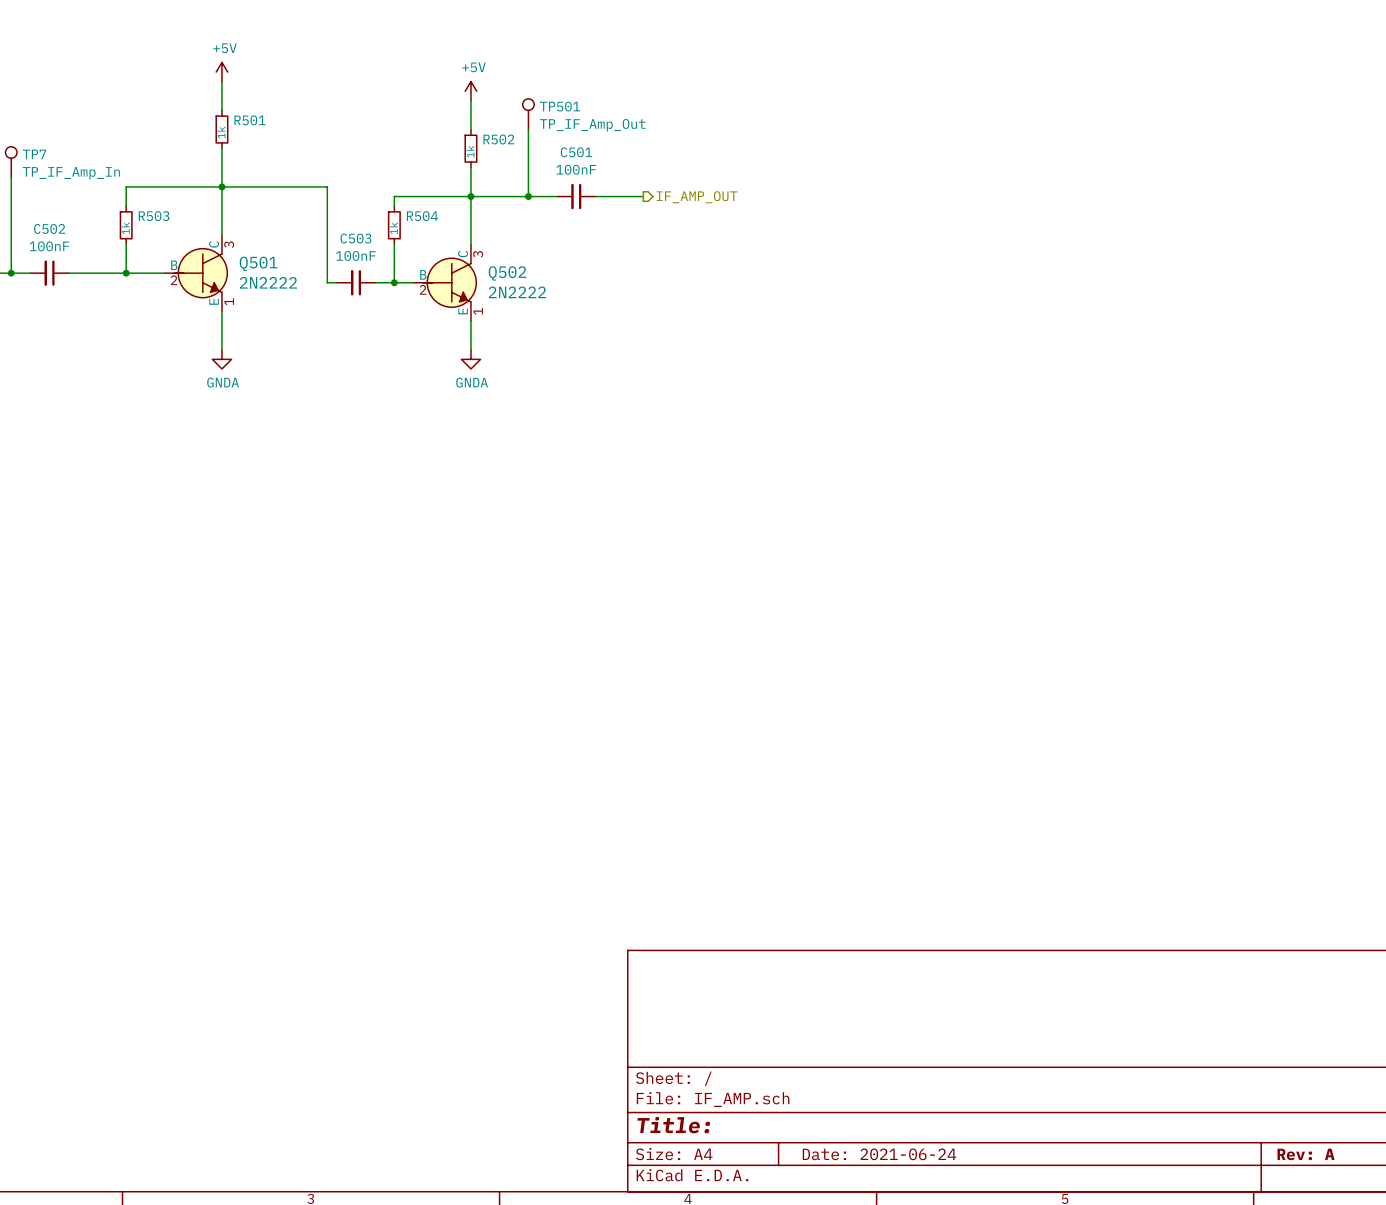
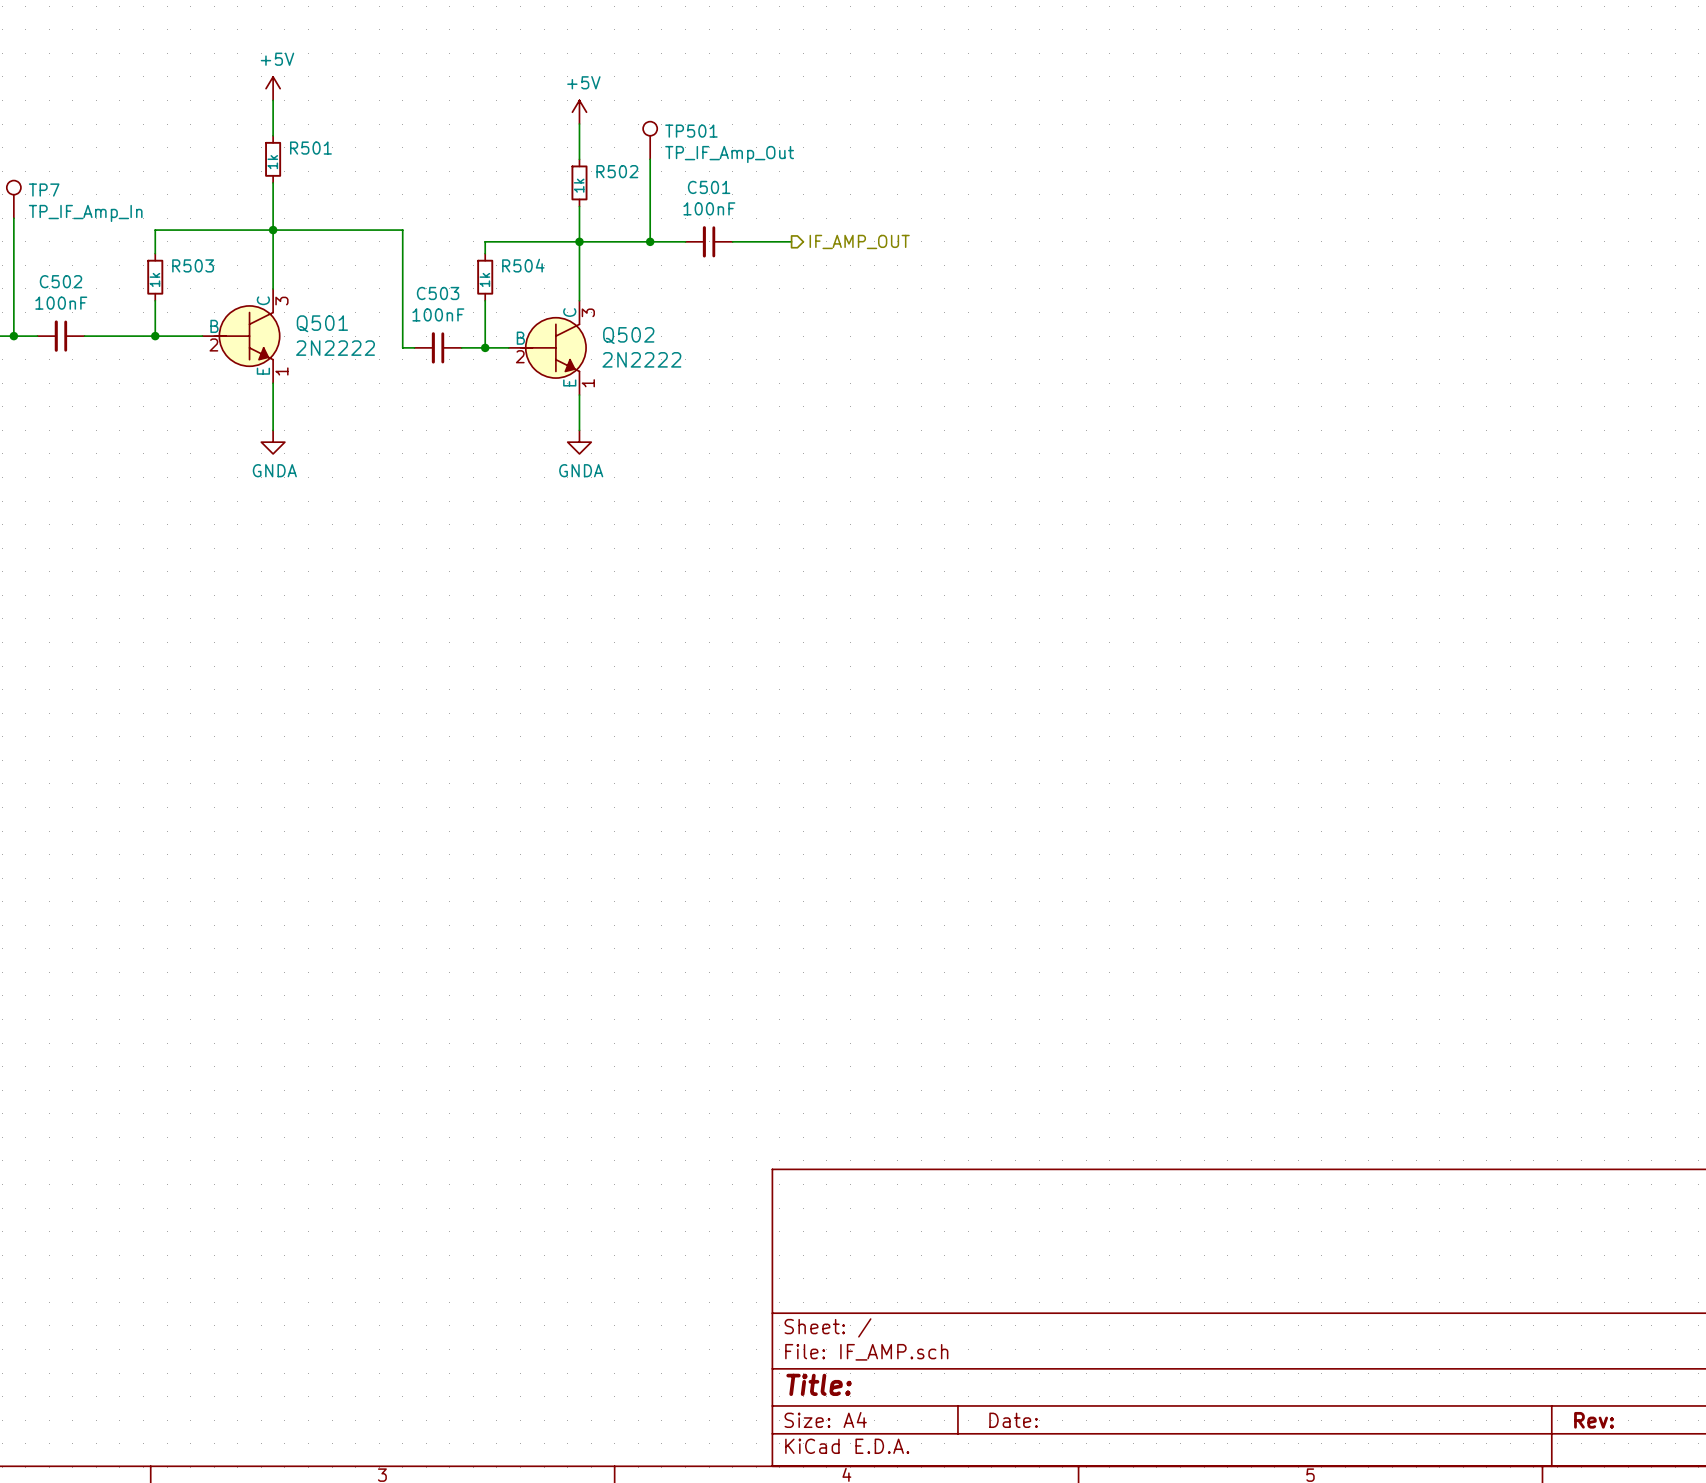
title block: Date: 2021-06-24 (879, 1154) -> Date: (1013, 1420)
title block: Rev: A (1306, 1154) -> Rev: (1594, 1420)

